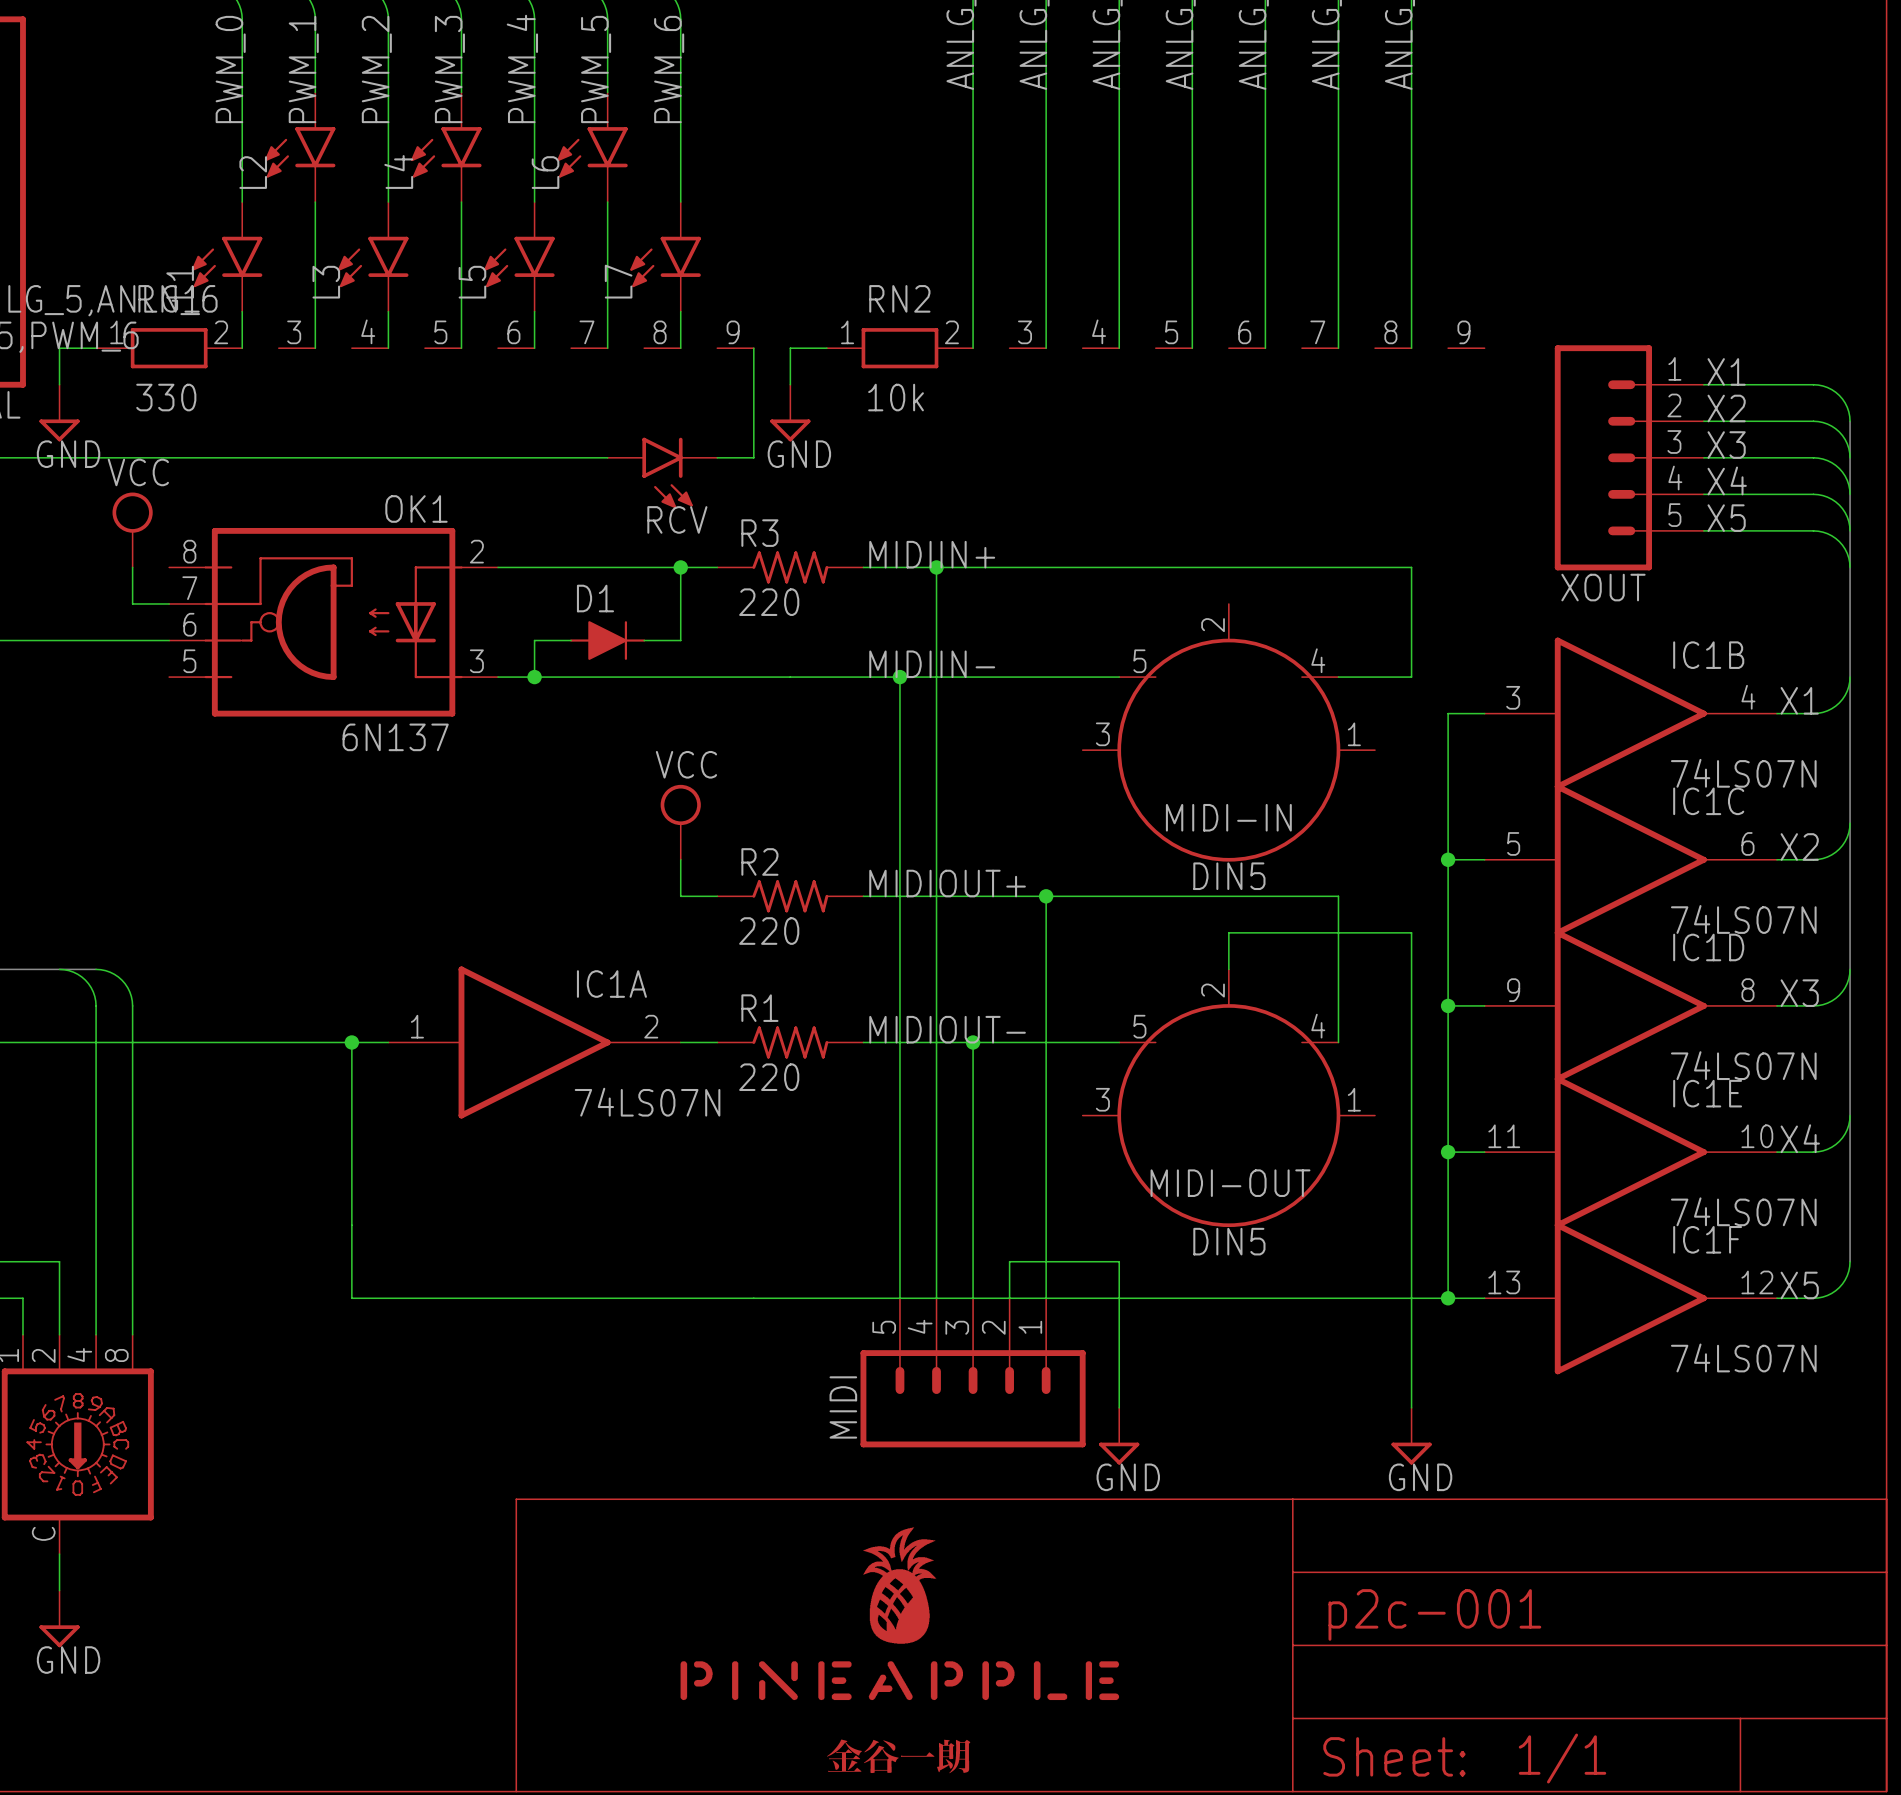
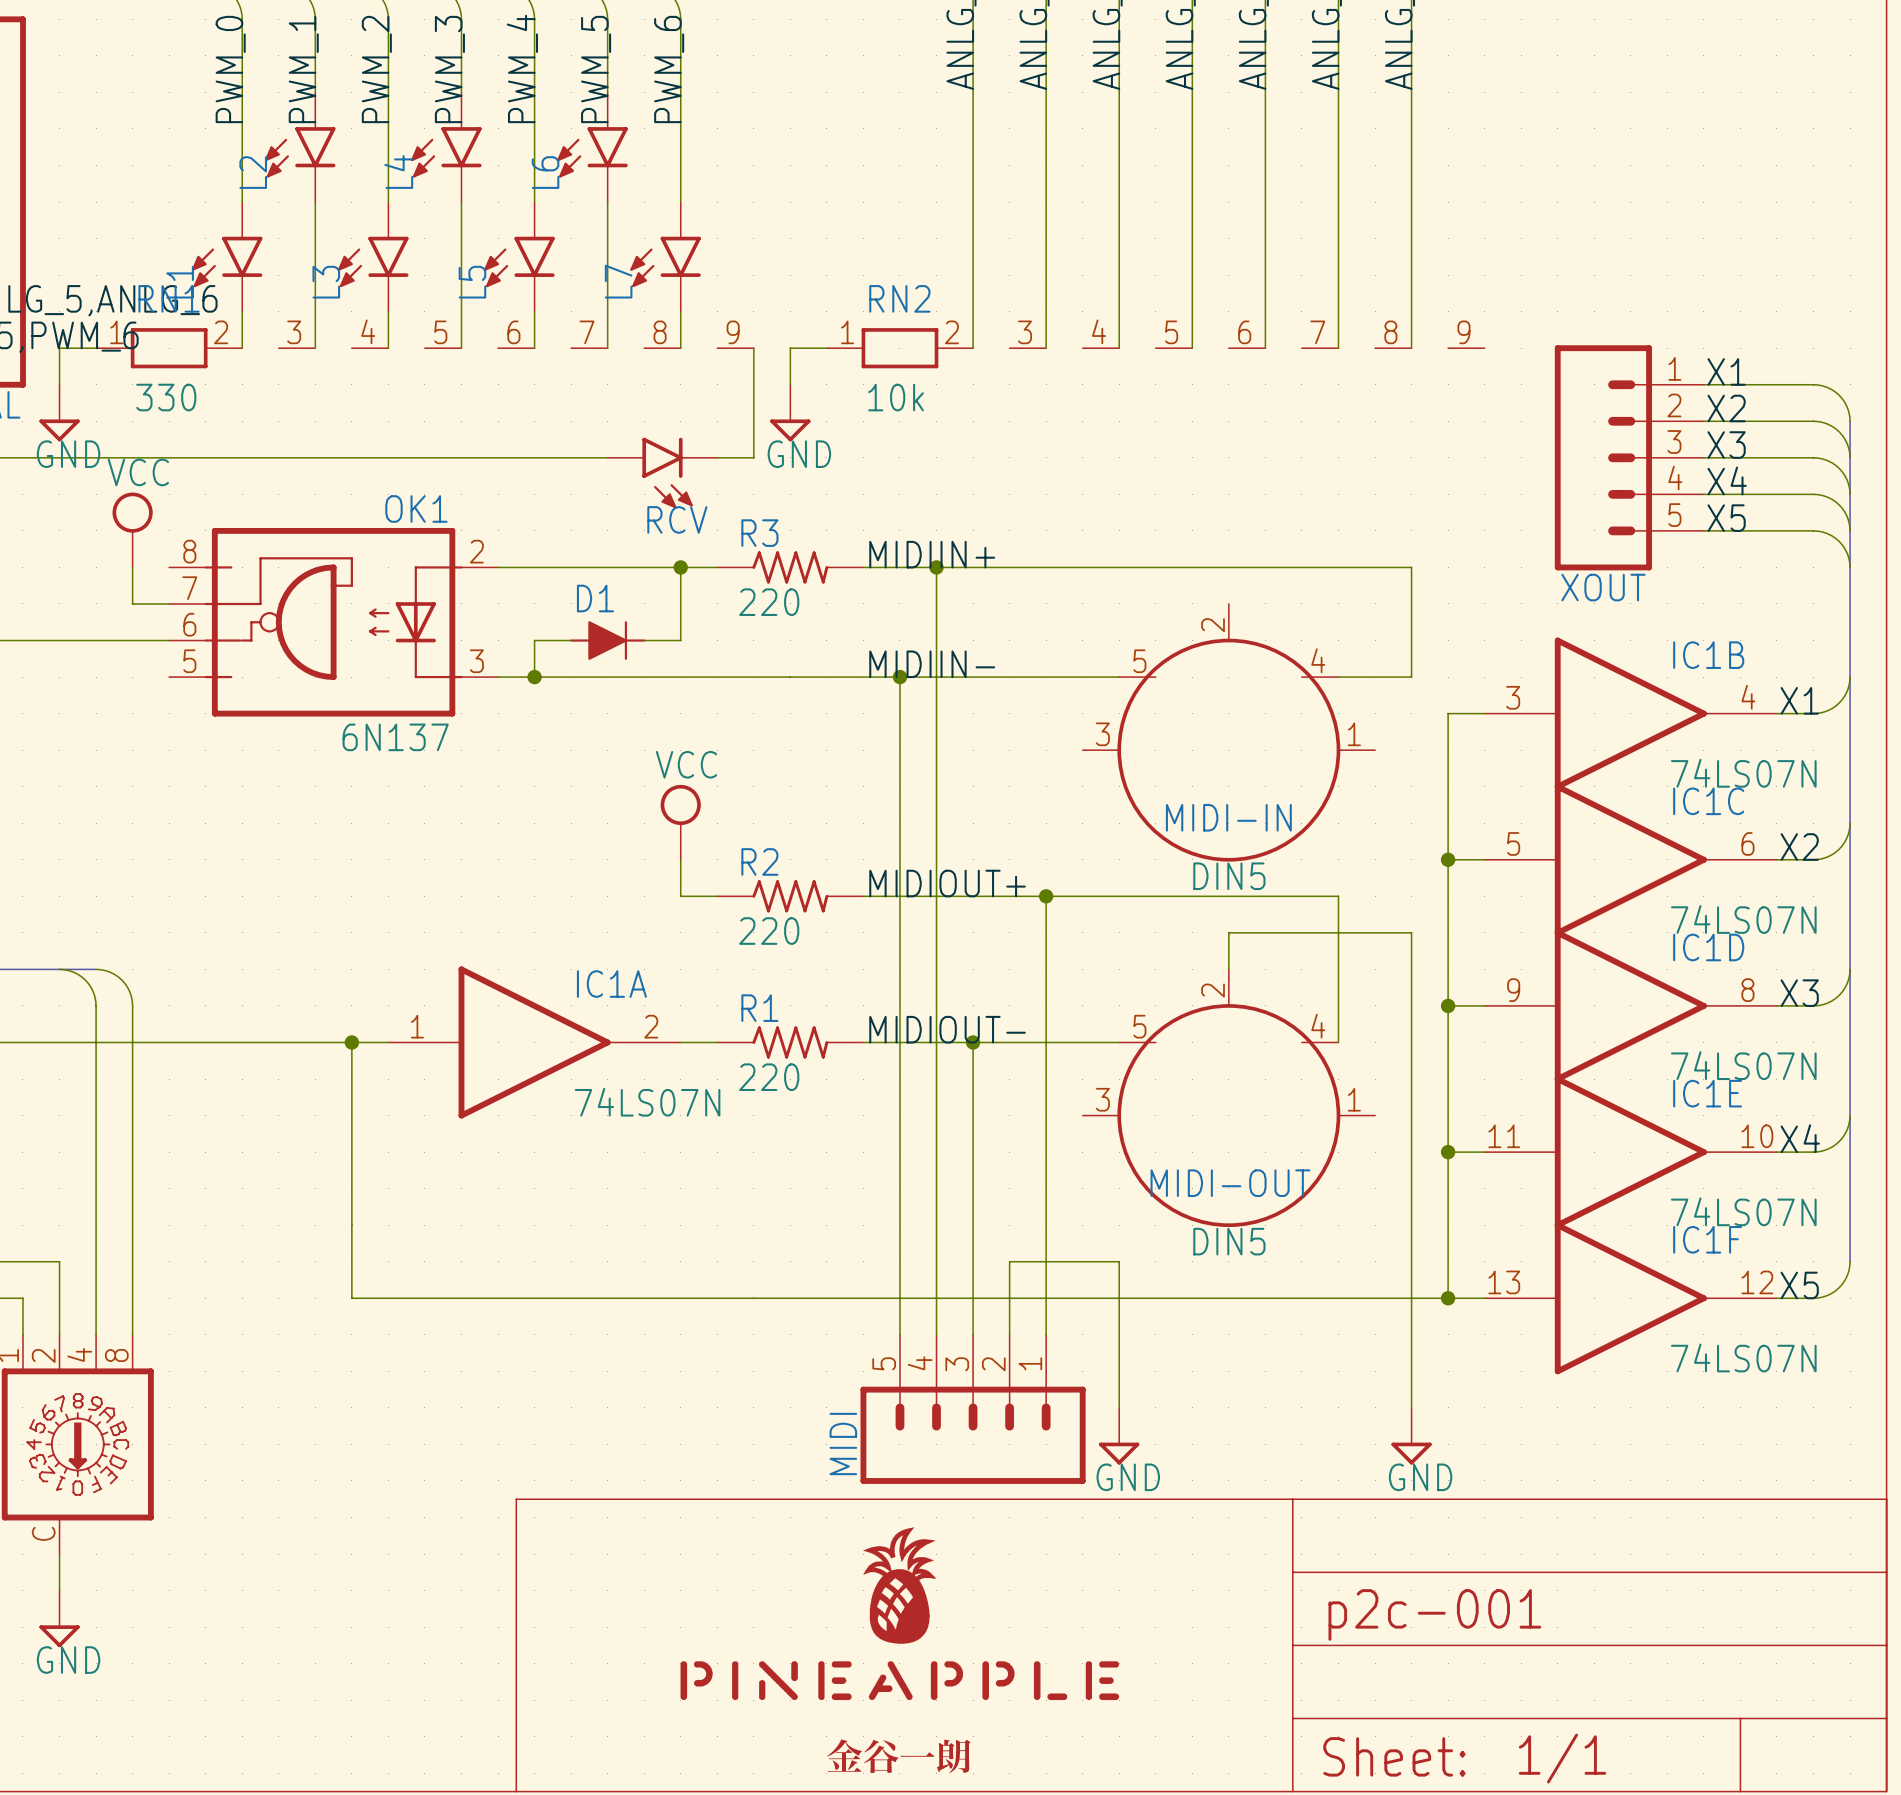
MIDI position: (973, 1372) -> (973, 1409)

